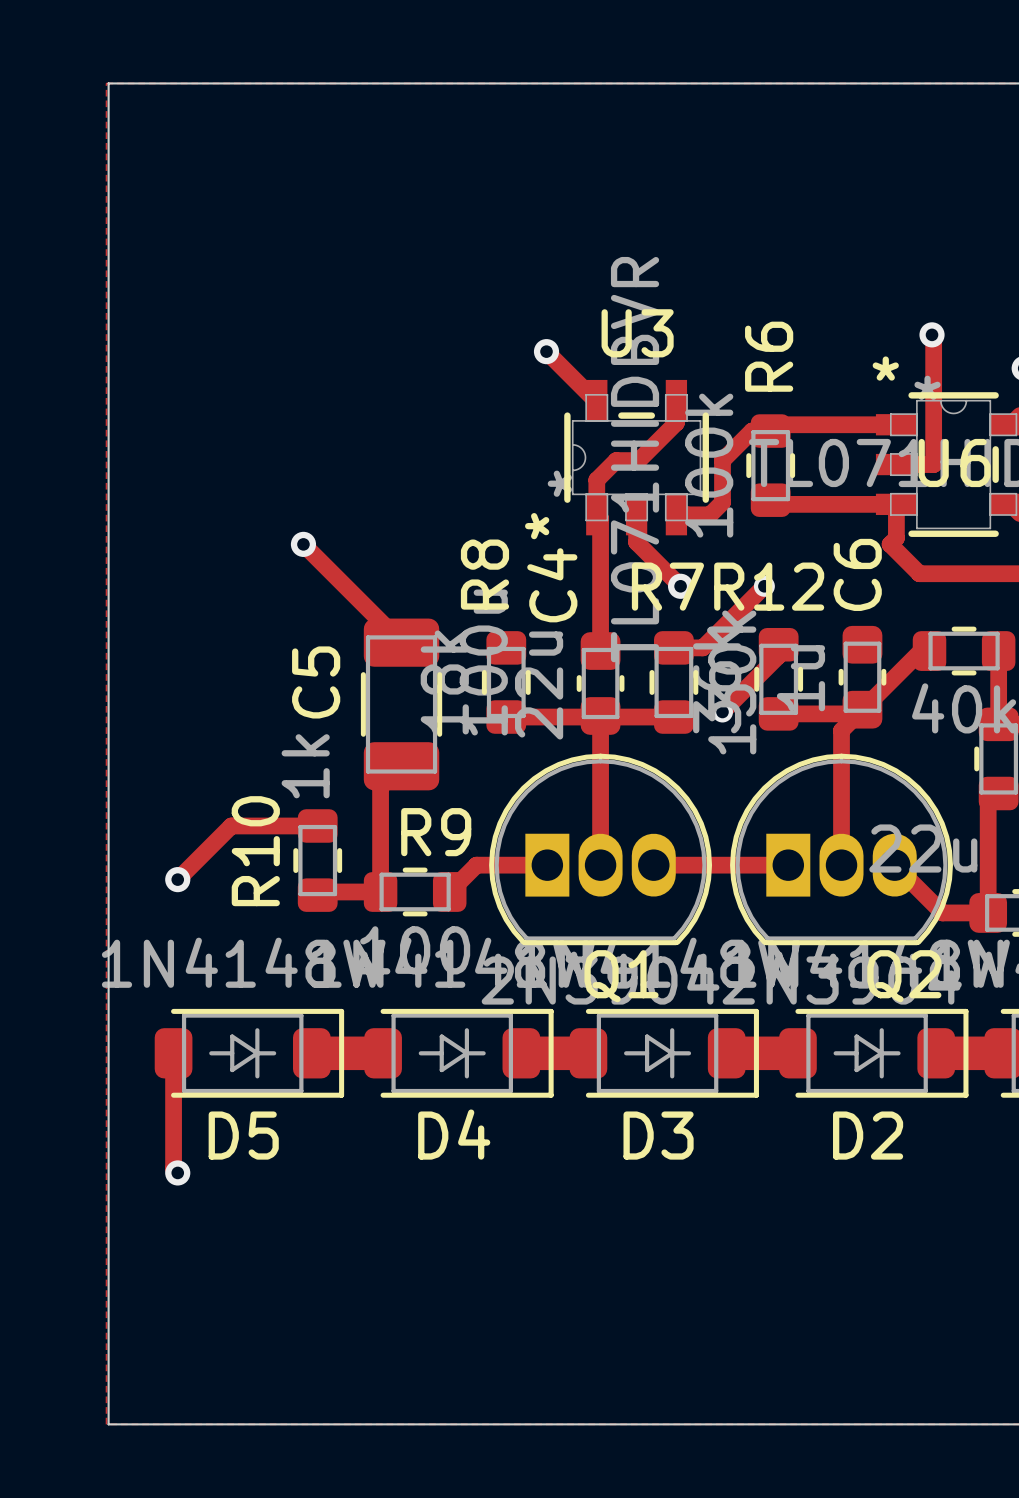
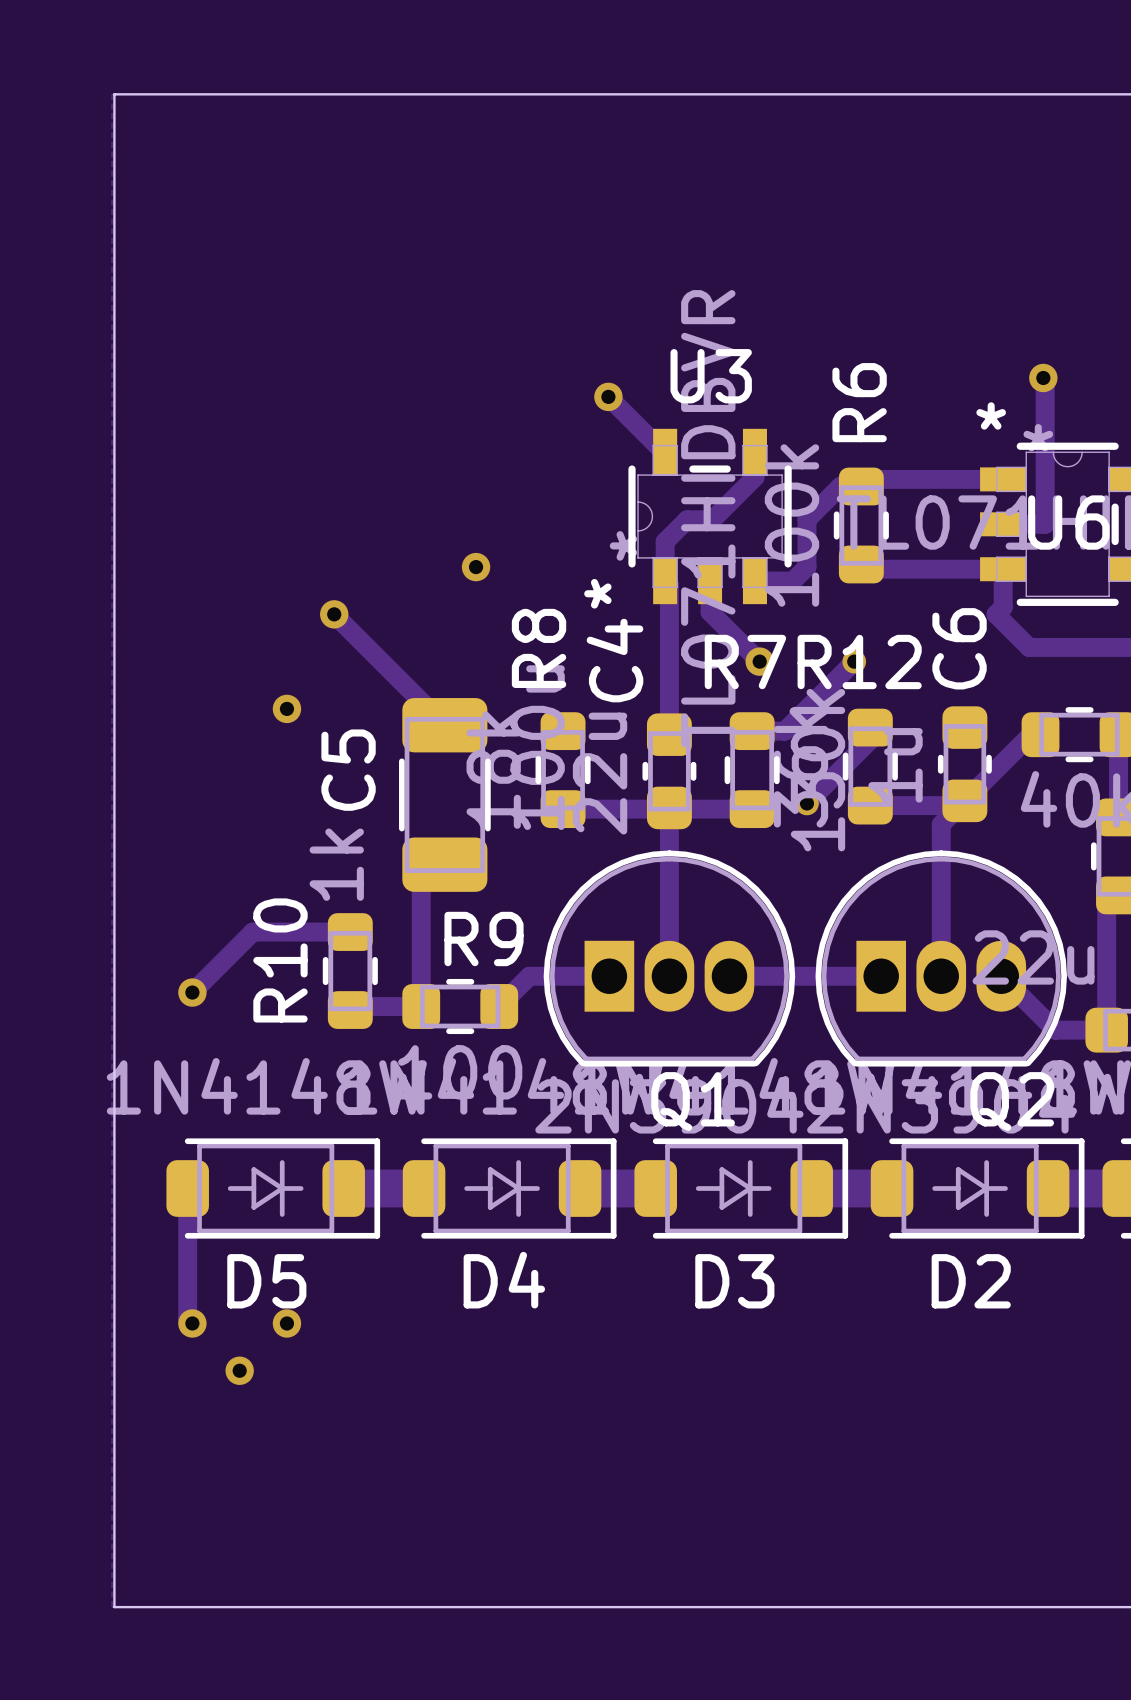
via: none -> (476, 567)
via: none -> (286, 708)
via: none -> (286, 1323)
via: none -> (239, 1370)

